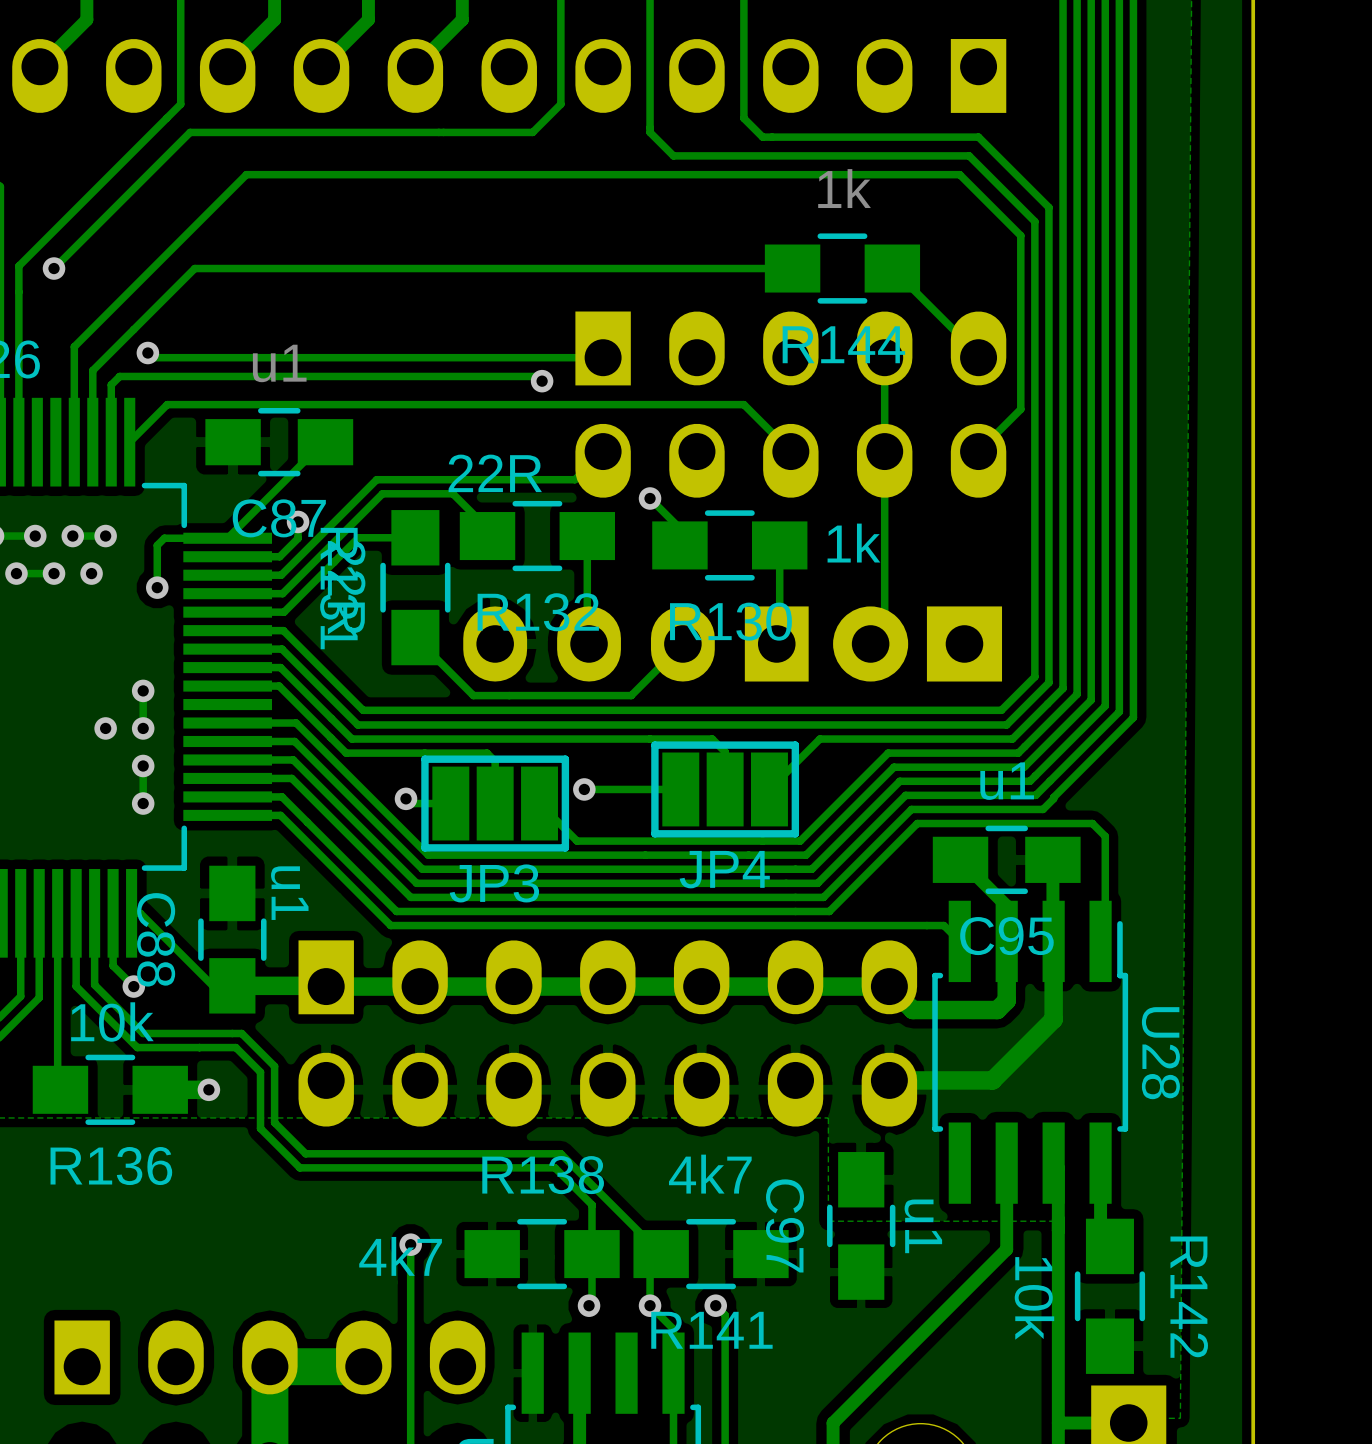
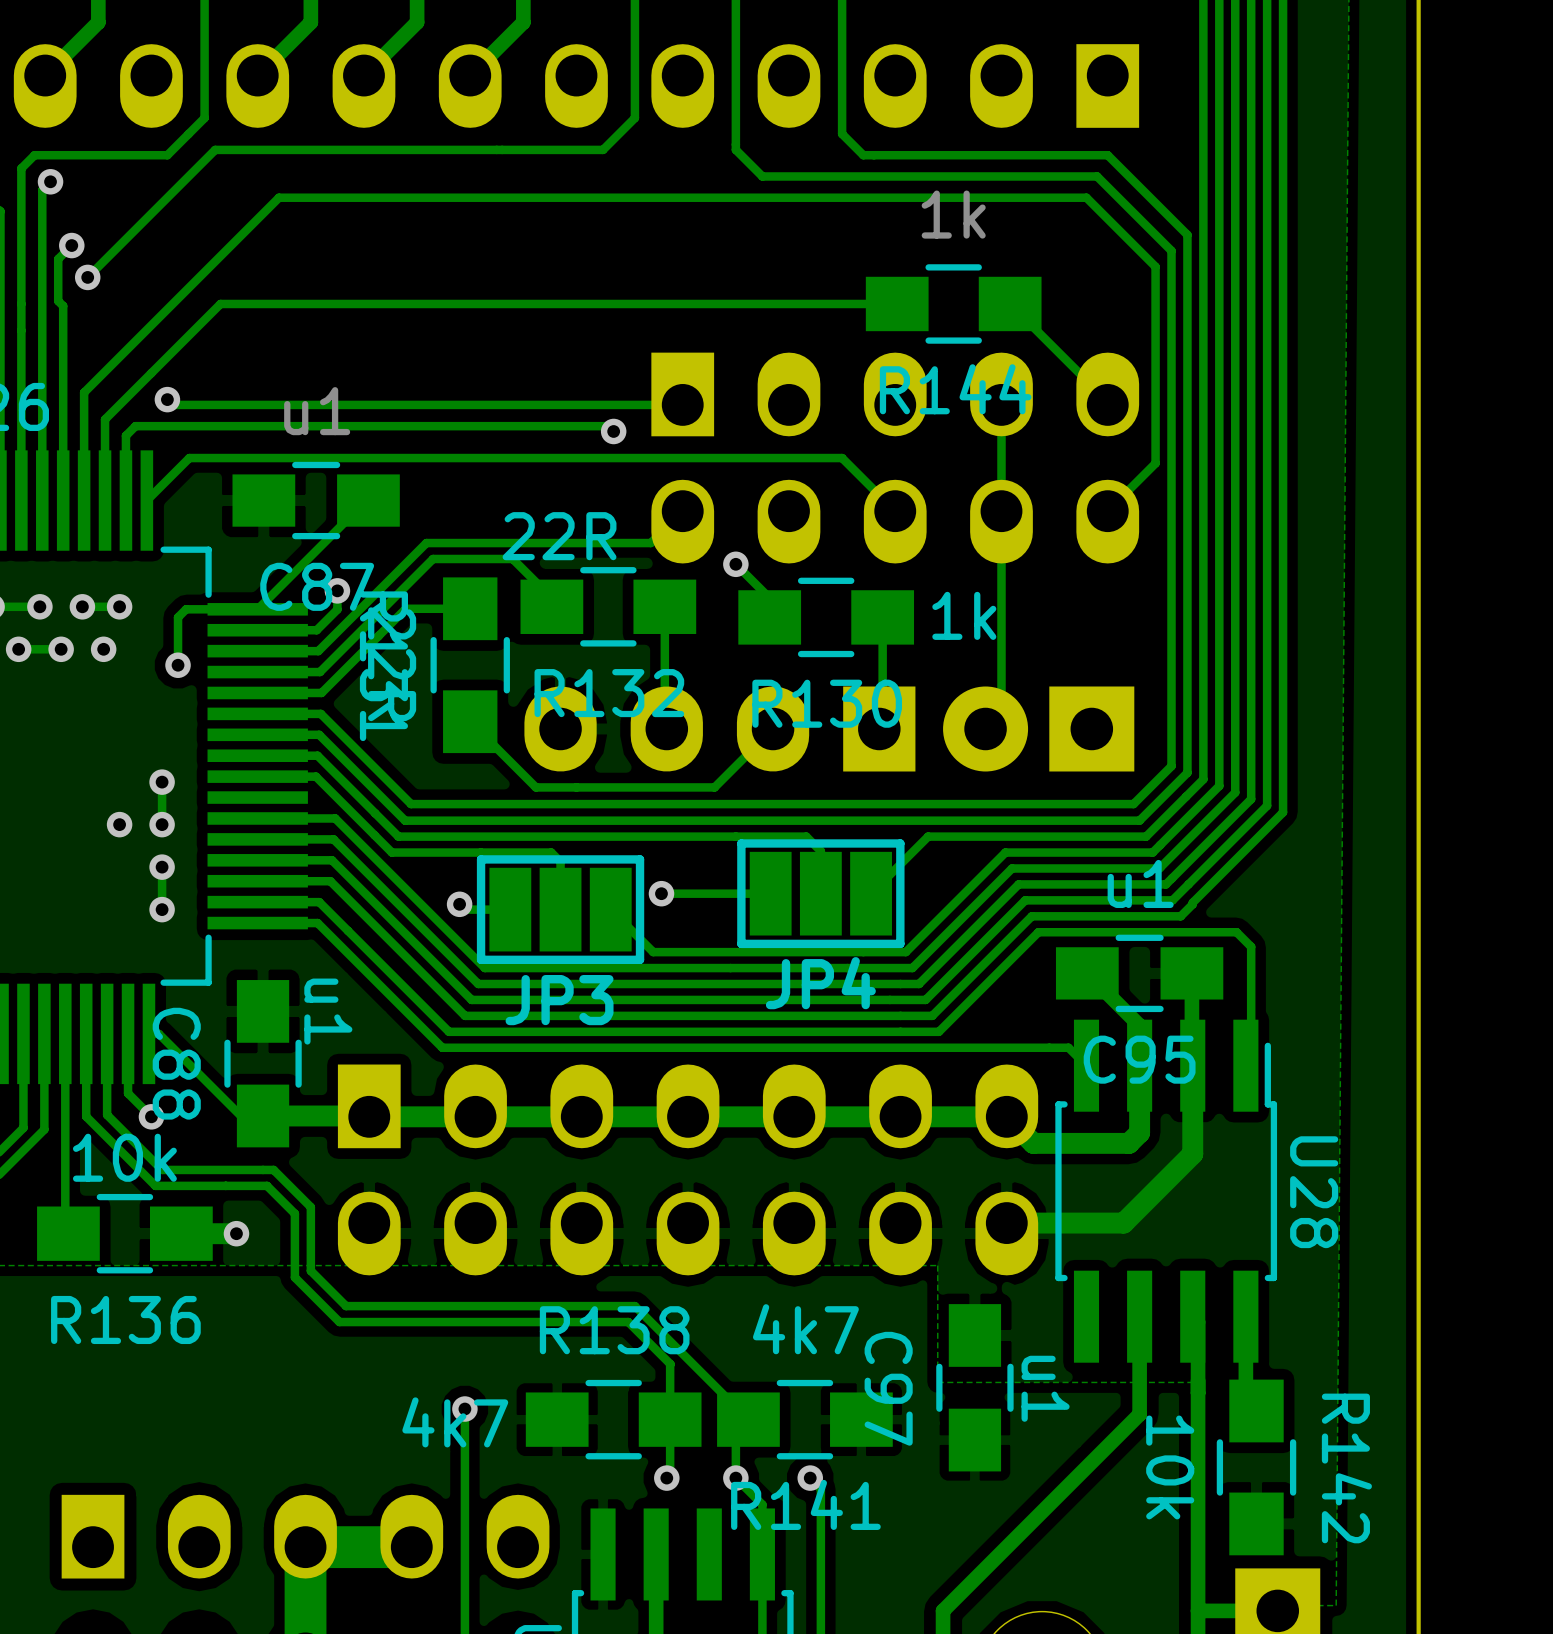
track: (147, 137) (18, 266) -> (167, 155) (34, 155) (21, 168) (21, 301)
track: none -> (50, 181) (42, 190) (42, 500)
via: none -> (50, 181)
track: none -> (71, 245) (58, 259) (58, 301) (63, 306) (63, 500)
via: none -> (71, 245)
track: (77, 245) (54, 268) -> none
via: none -> (87, 277)
via: (54, 268) -> none

